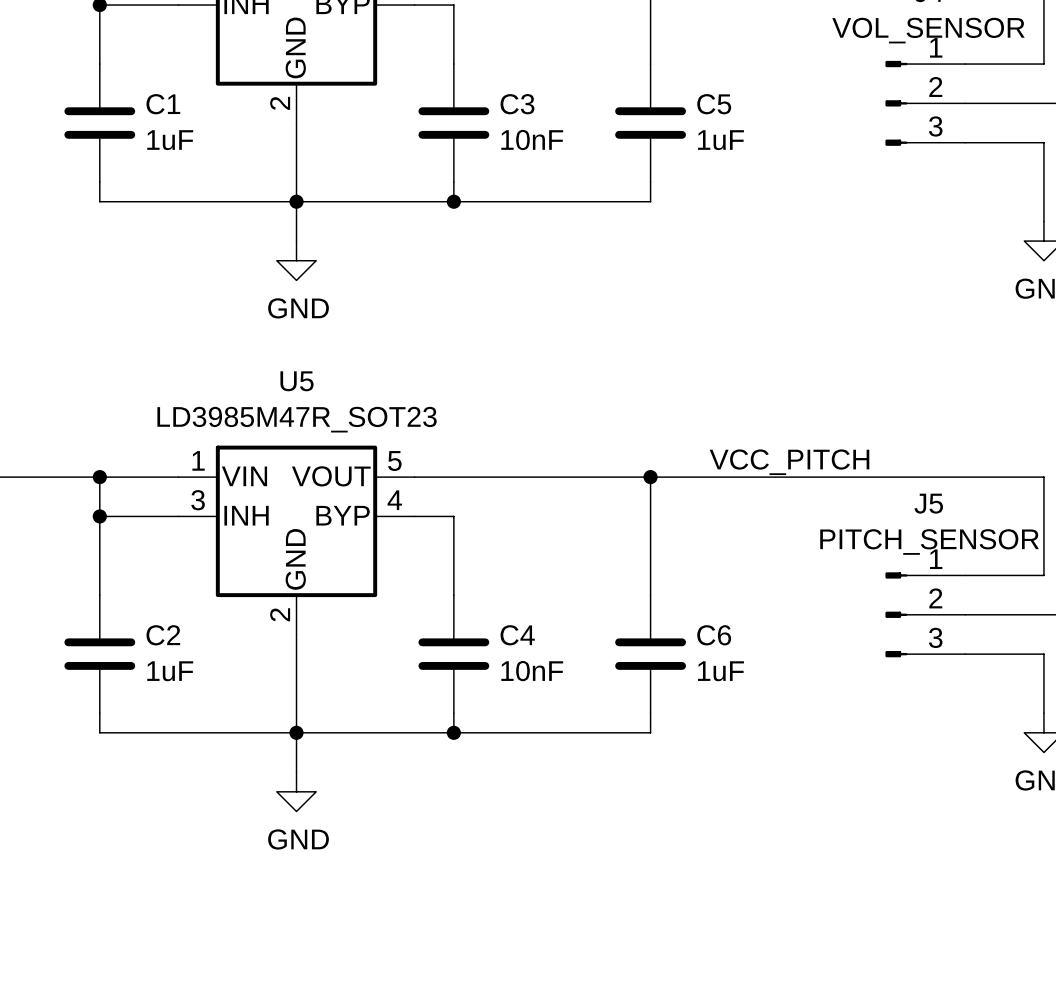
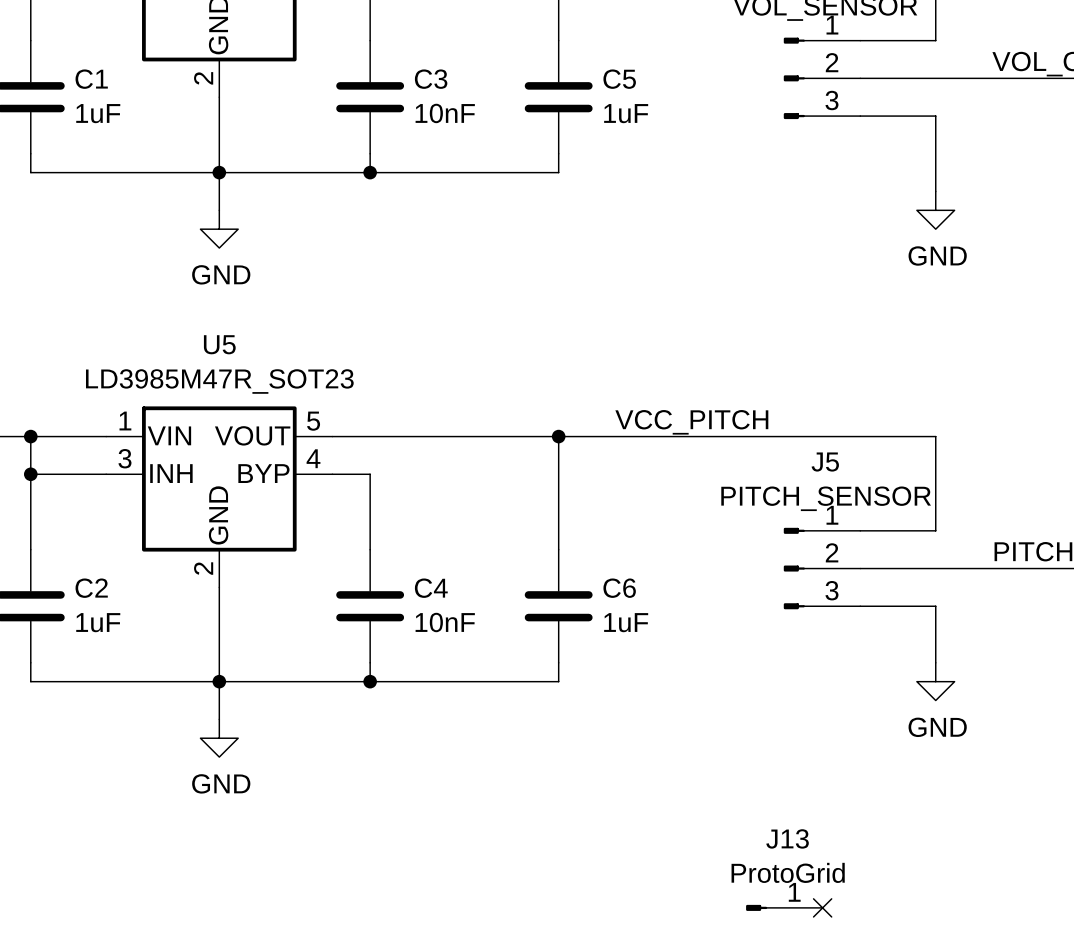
J13: none -> ProtoGrid (784, 907)
no-connect mark: none -> (822, 907)

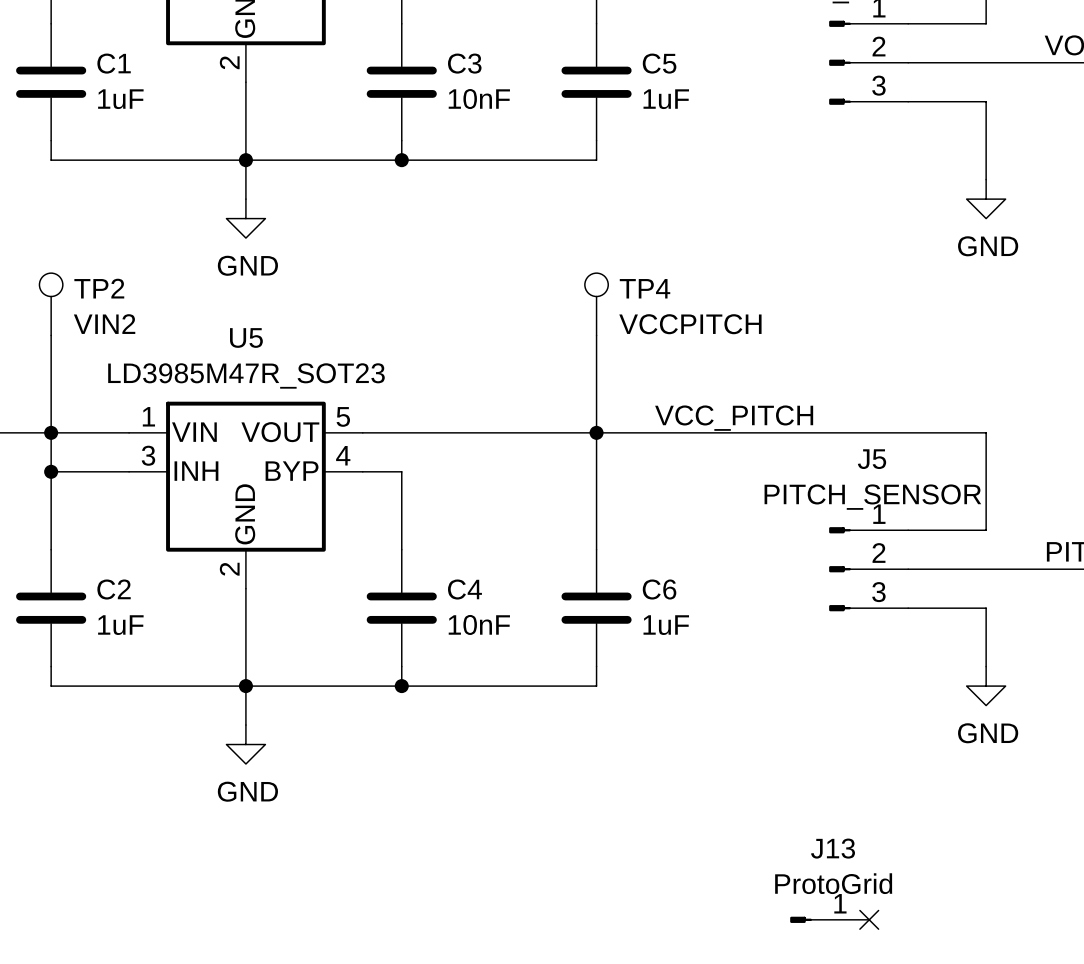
TP2: none -> VIN2 (51, 304)
TP4: none -> VCCPITCH (596, 304)
wire: none -> (51, 335) (51, 432)
wire: none -> (596, 335) (596, 432)

